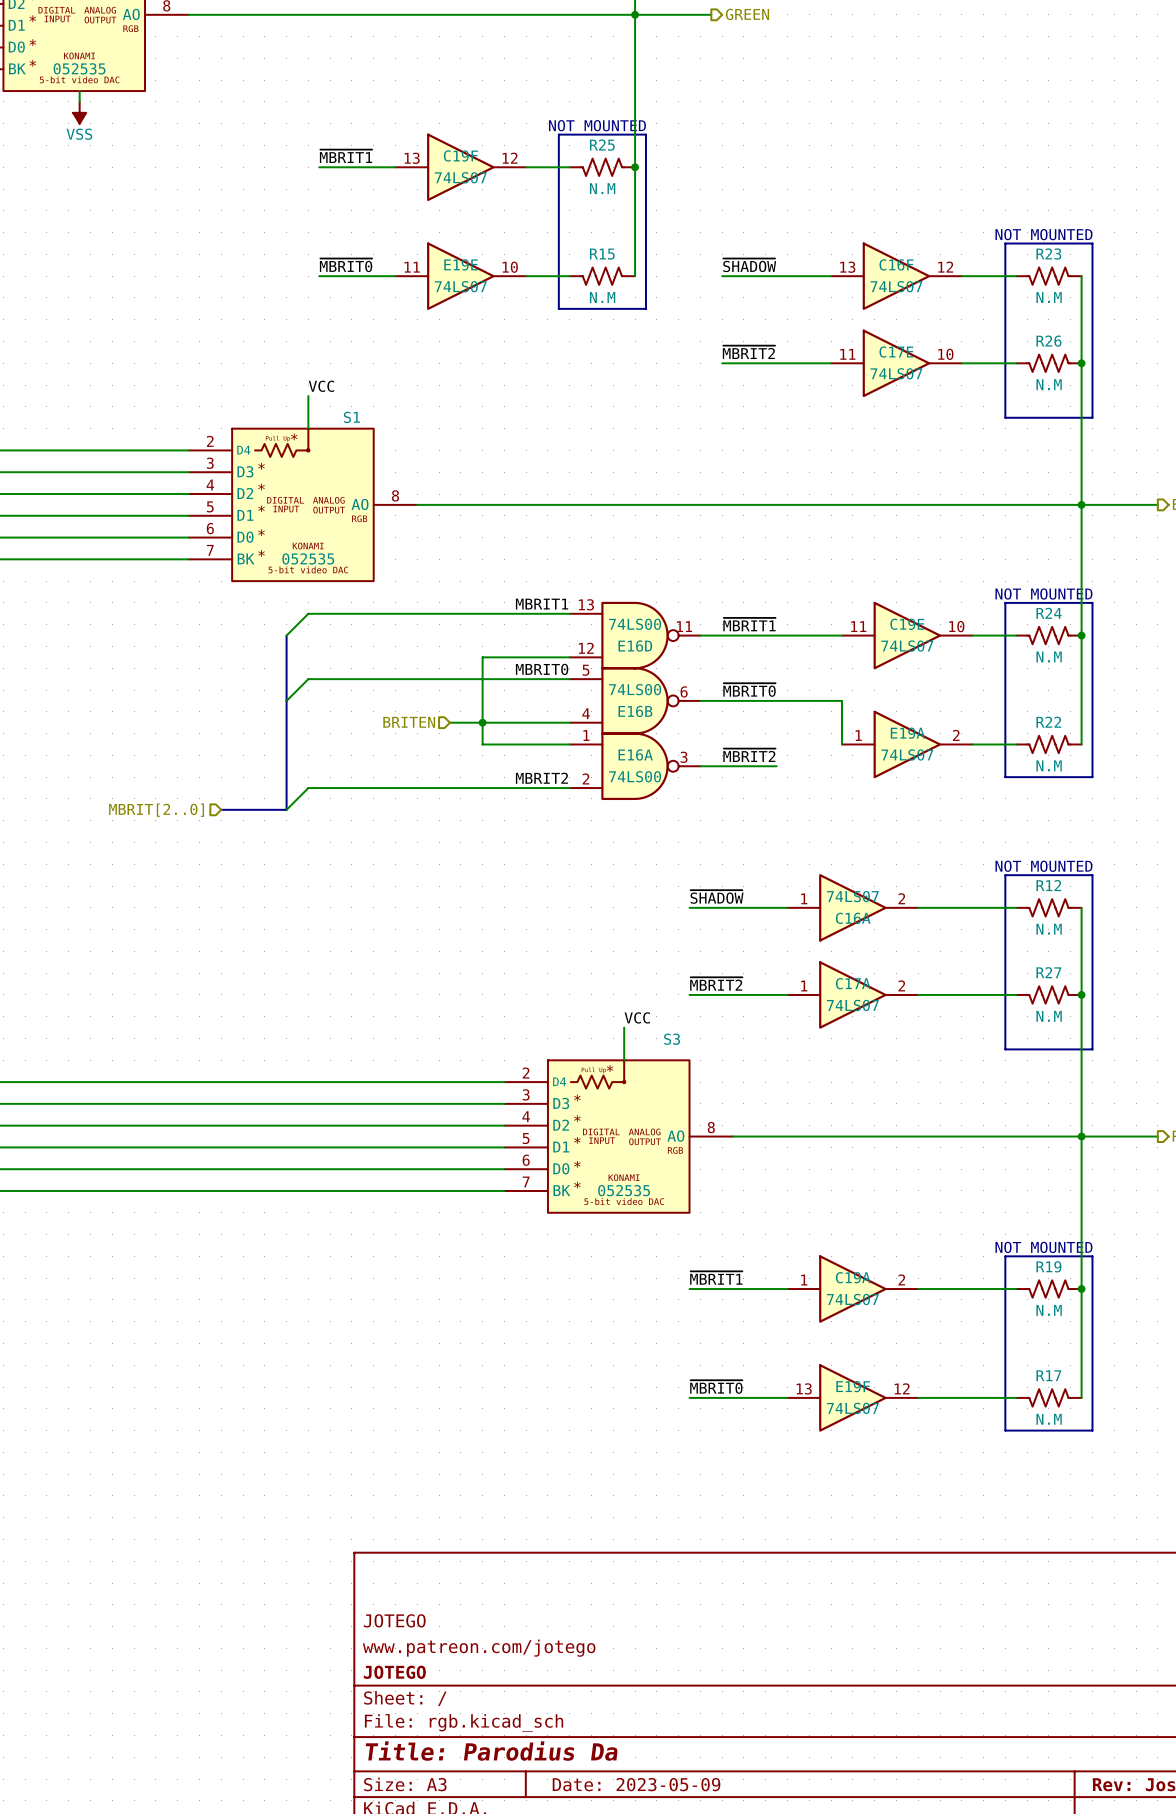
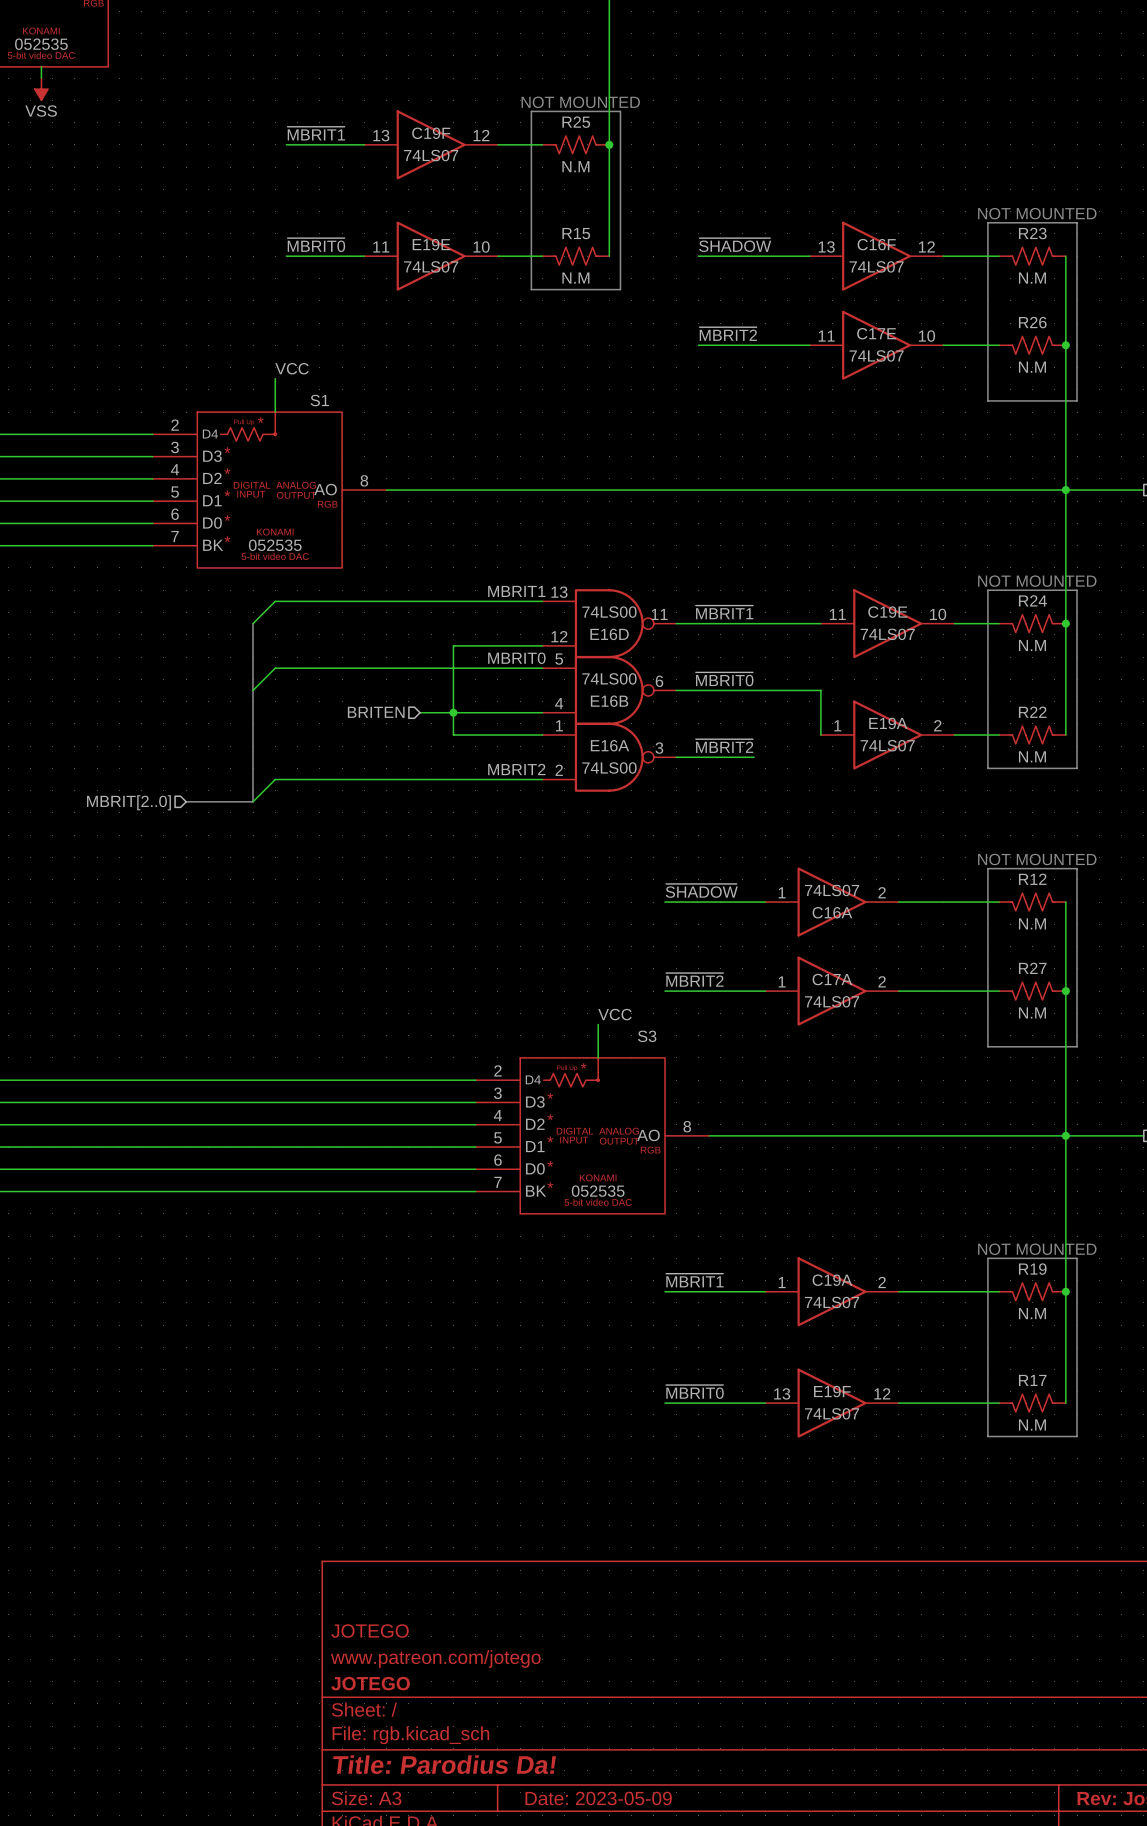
title block: Title: Parodius Da (491, 1751) -> Title: Parodius Da! (444, 1764)

